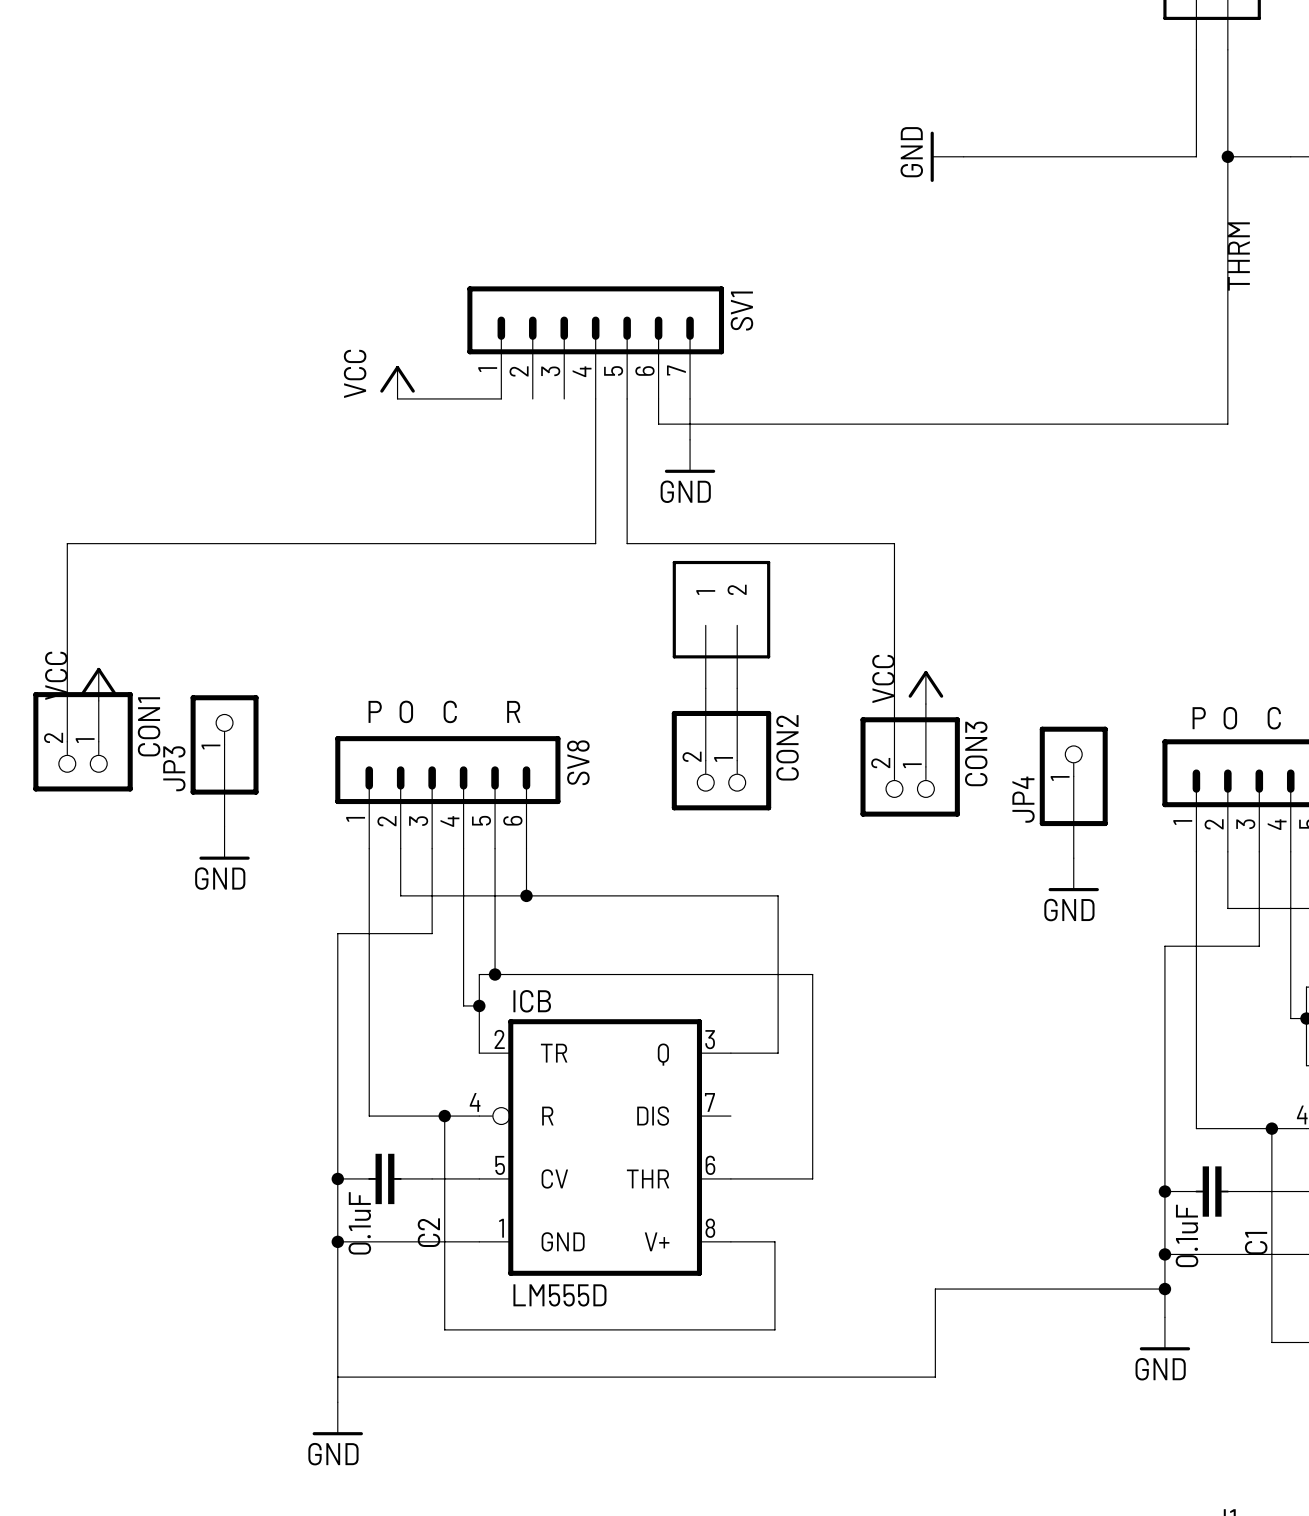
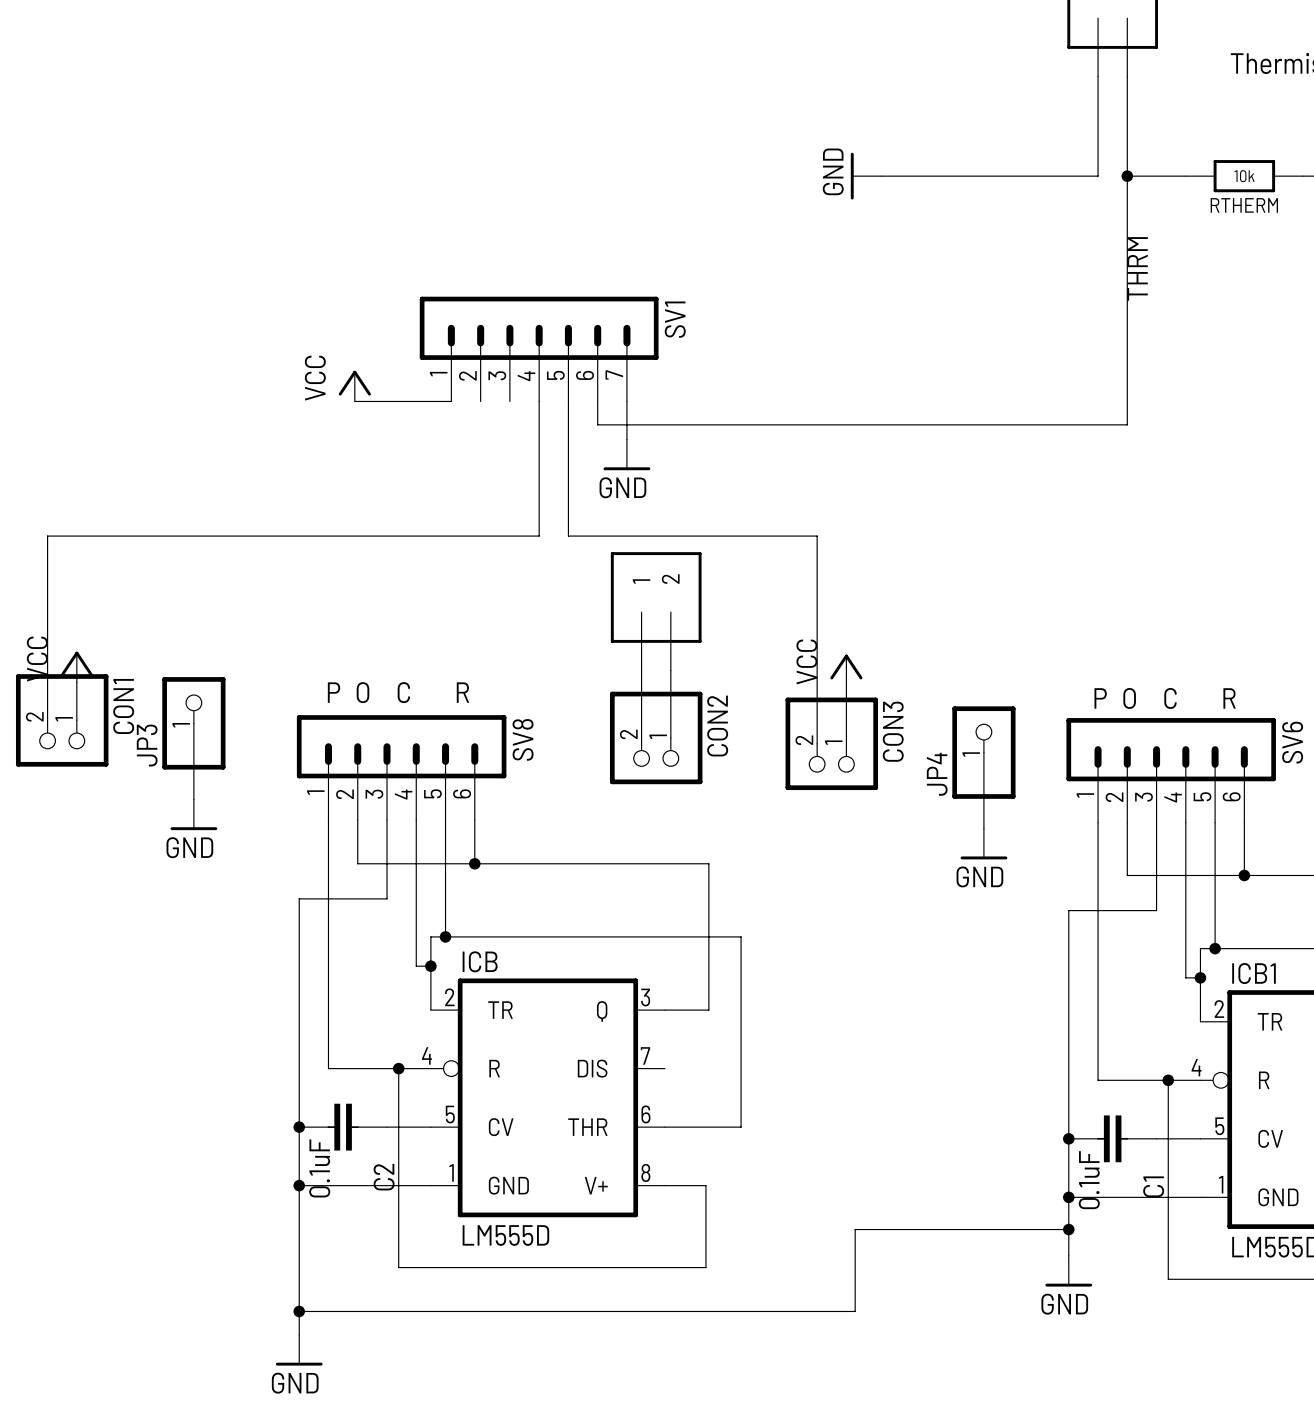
junction: none -> (299, 1311)

